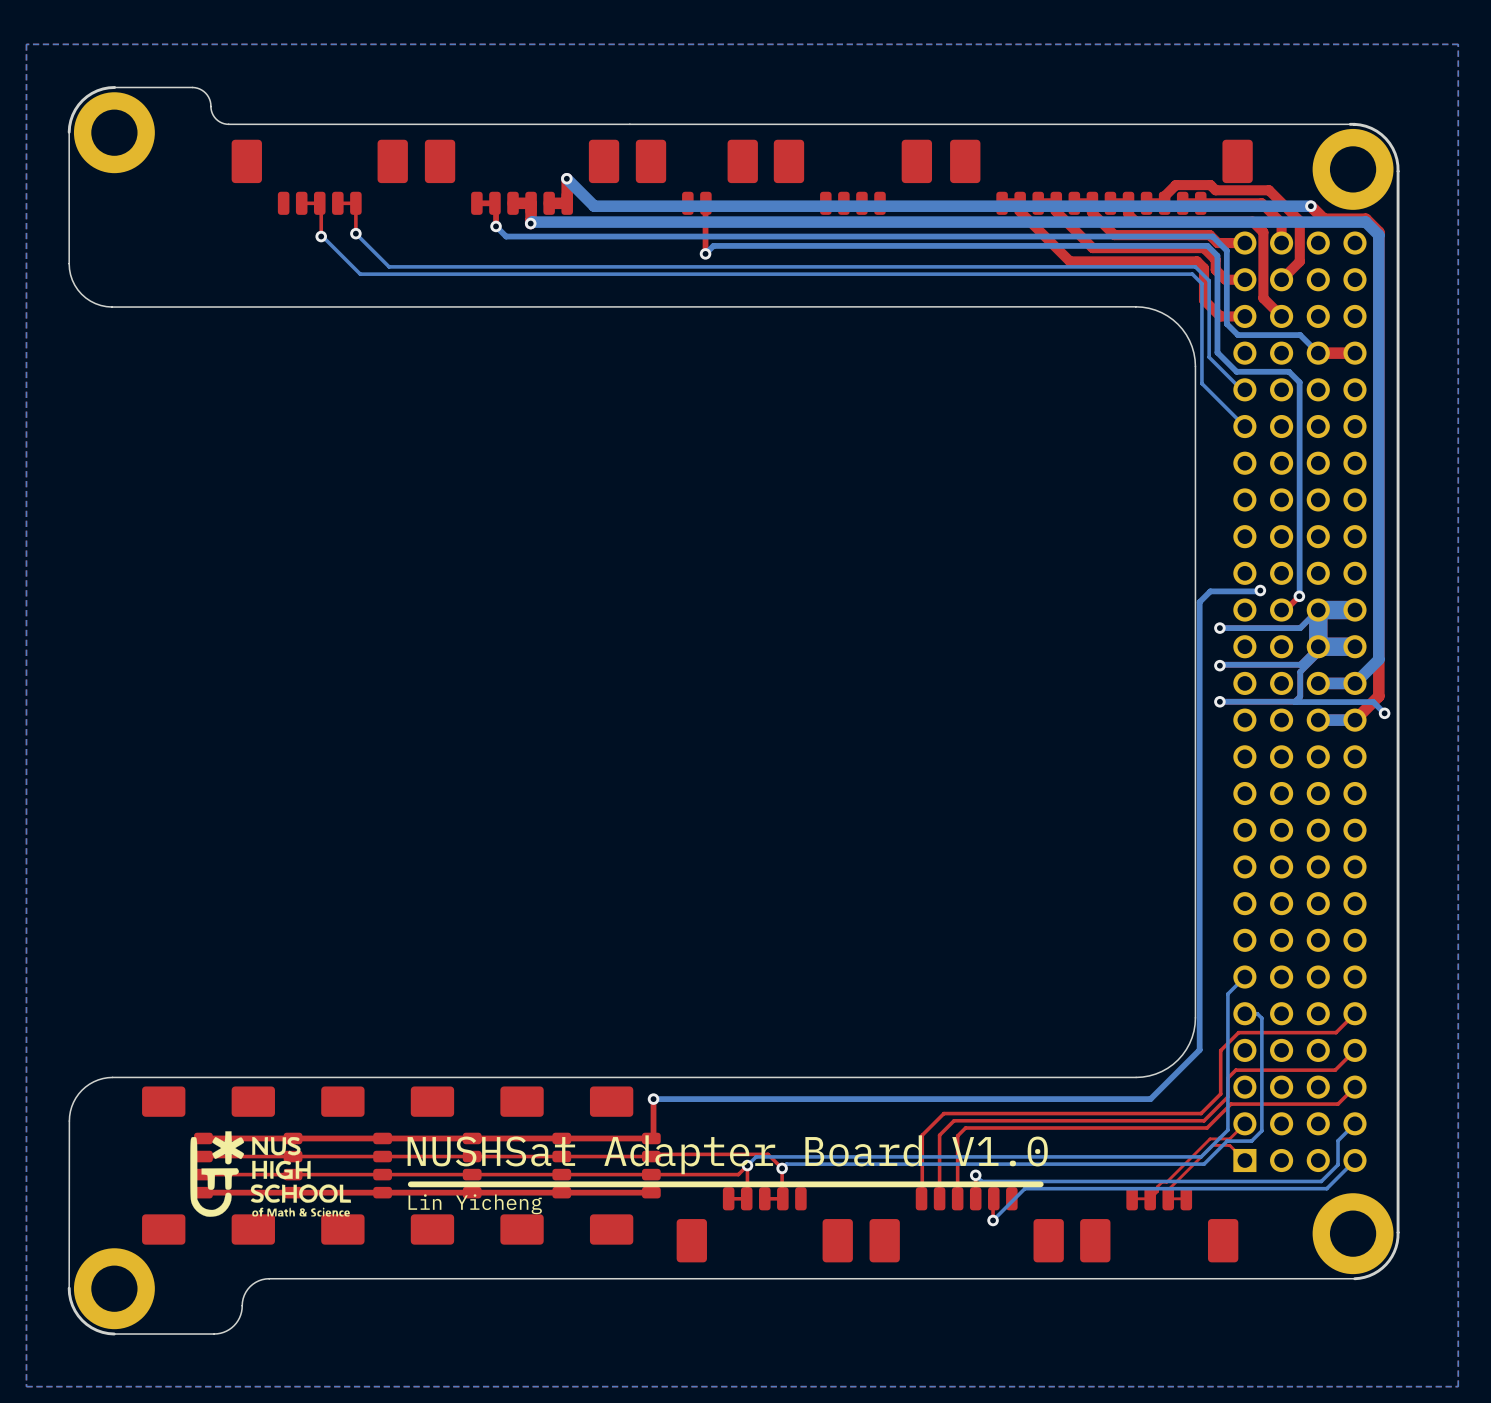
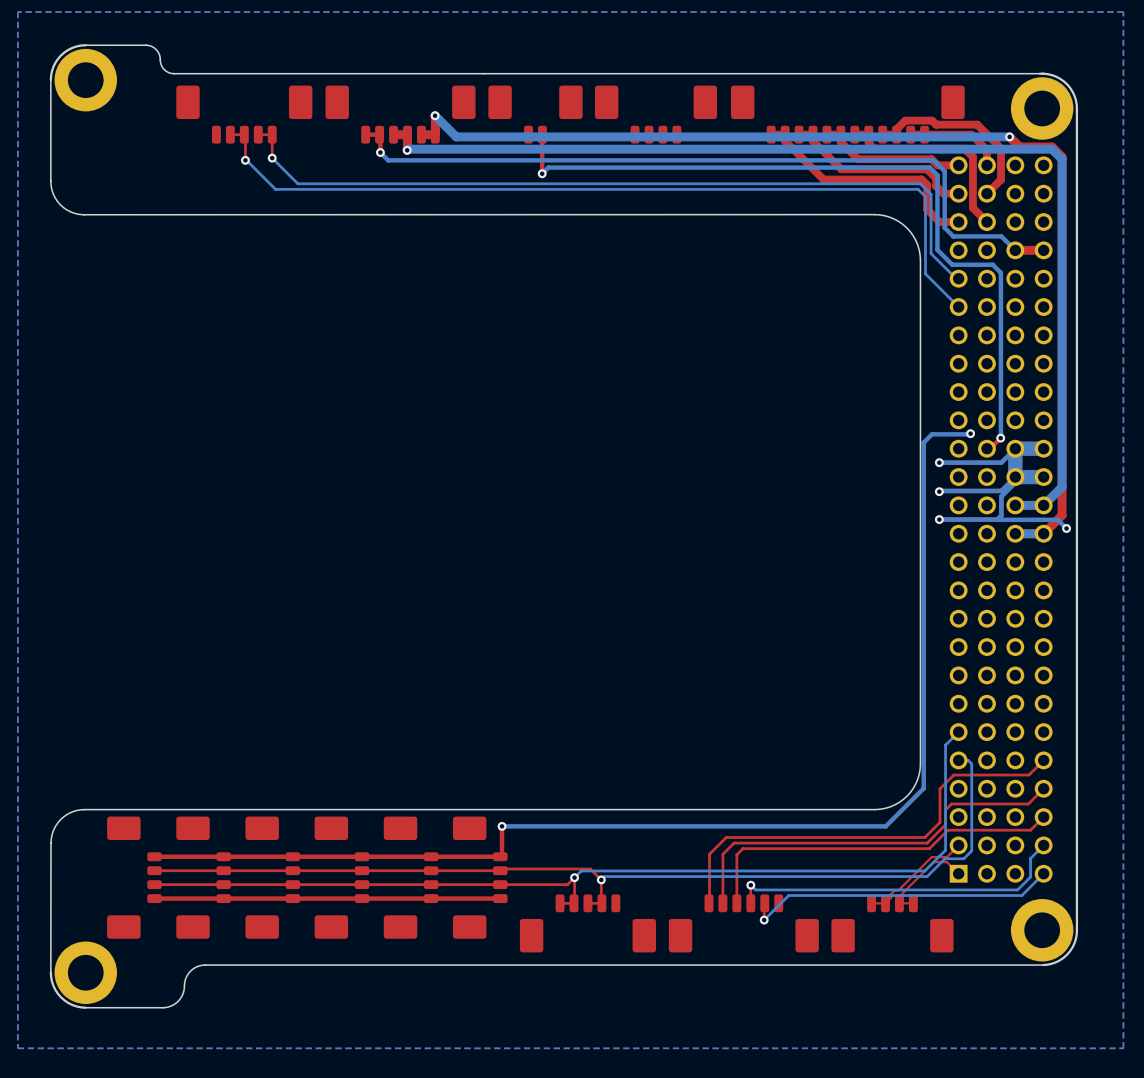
drawing: [190, 1131, 352, 1217] -> none
text: NUSHSat Adapter Board V1.0 (727, 1154) -> none
line: (1040, 1184) (410, 1184) -> none
text: Lin Yicheng (475, 1204) -> none

